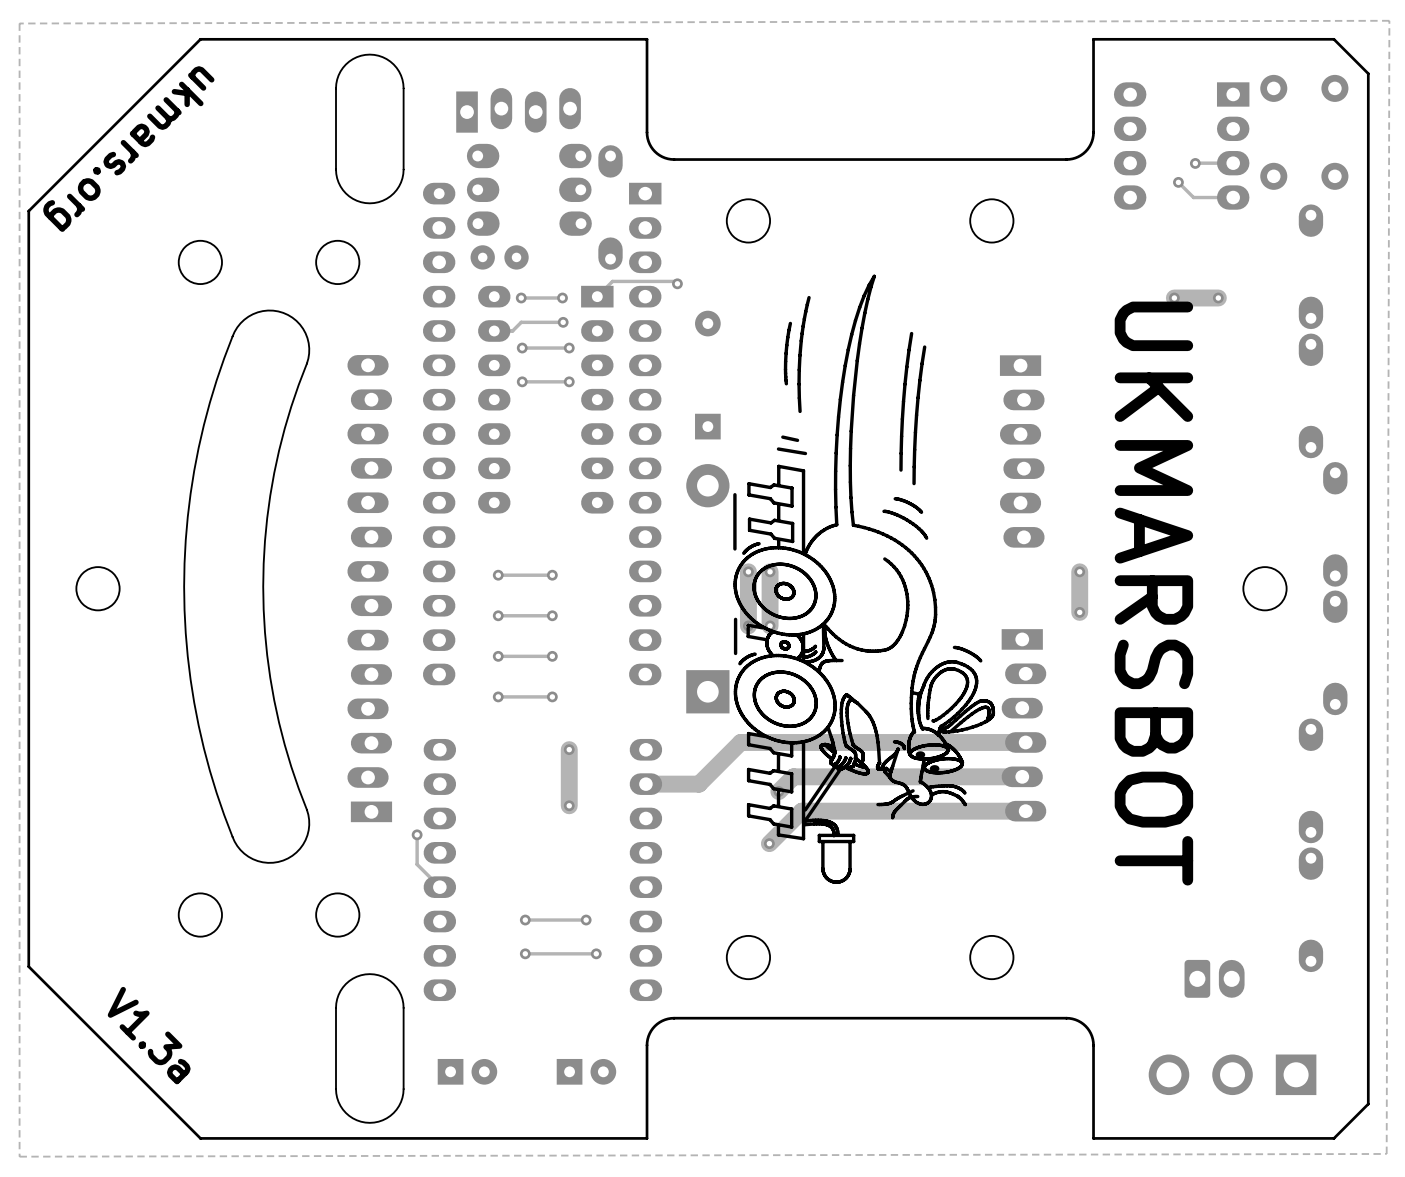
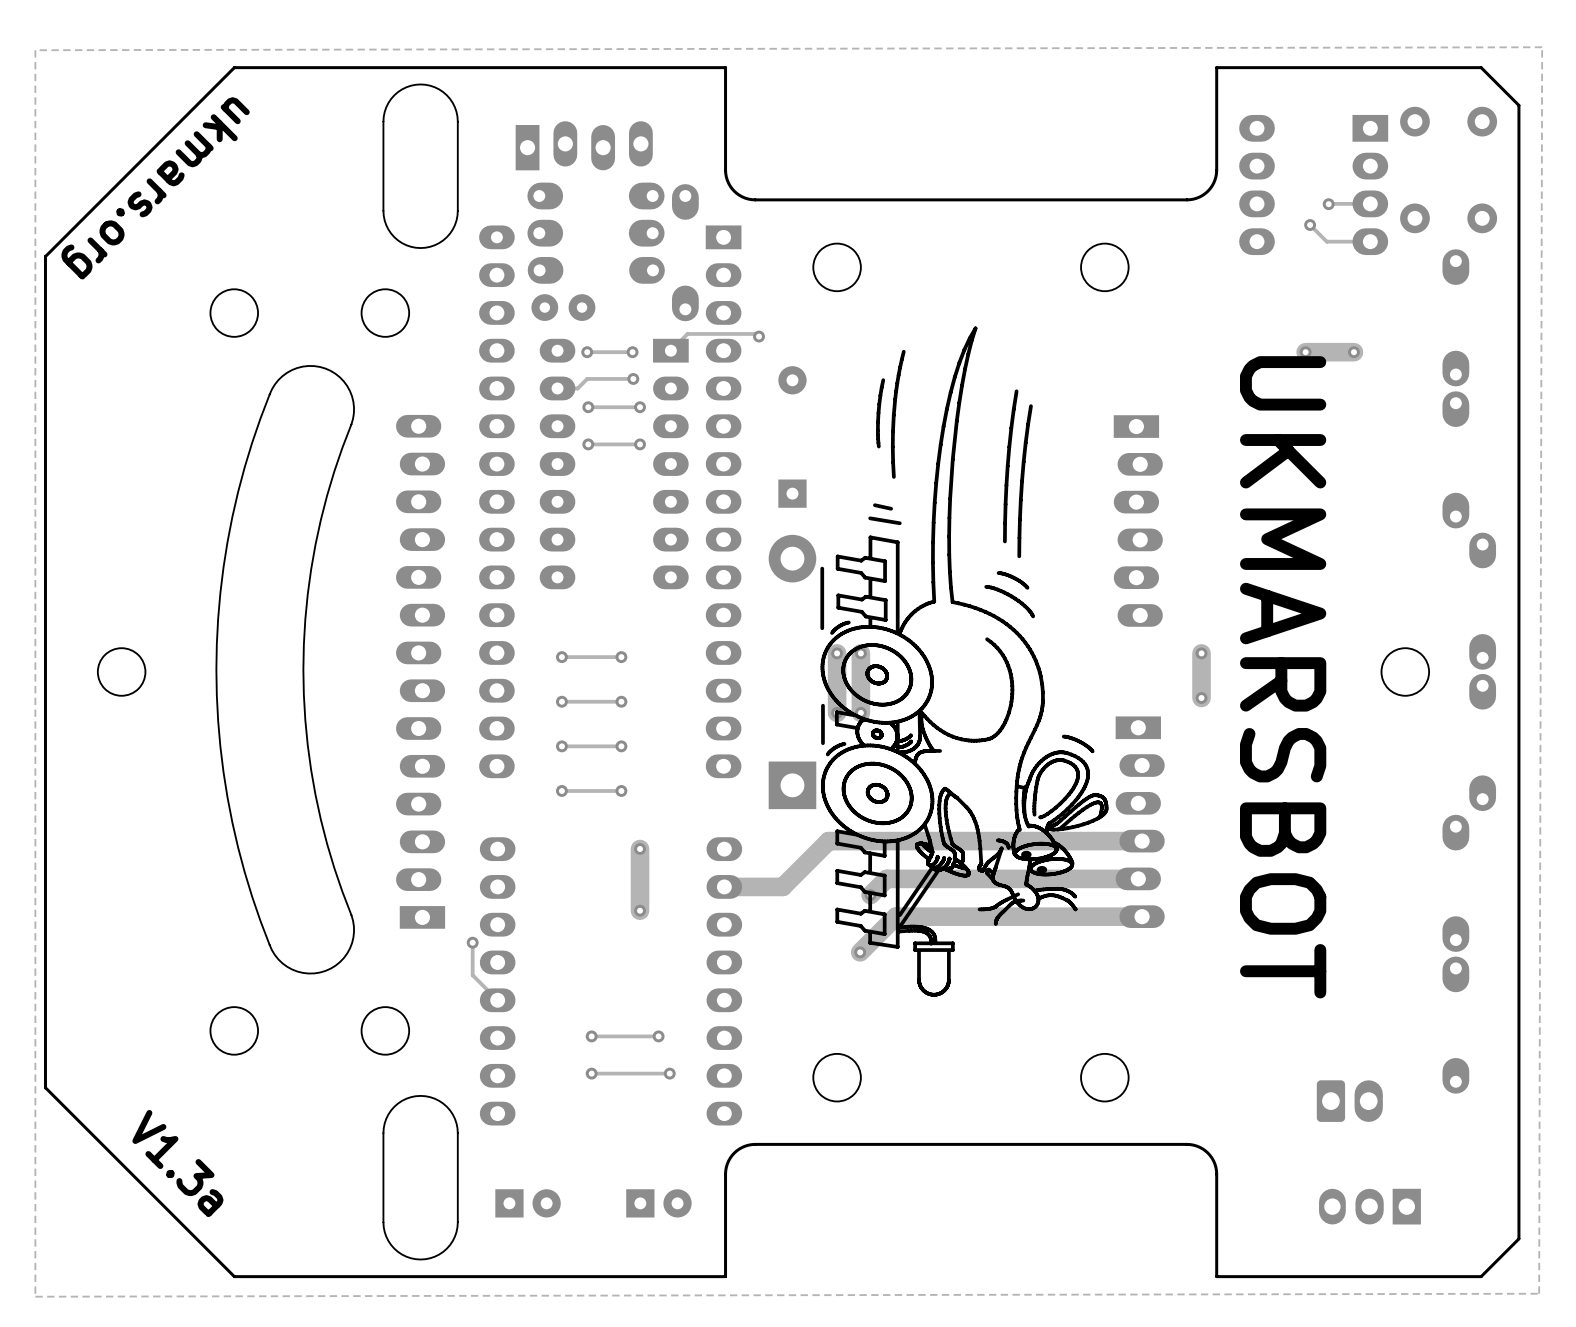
part footprint: [1148, 1054, 1317, 1096] -> [1319, 1188, 1421, 1225]

